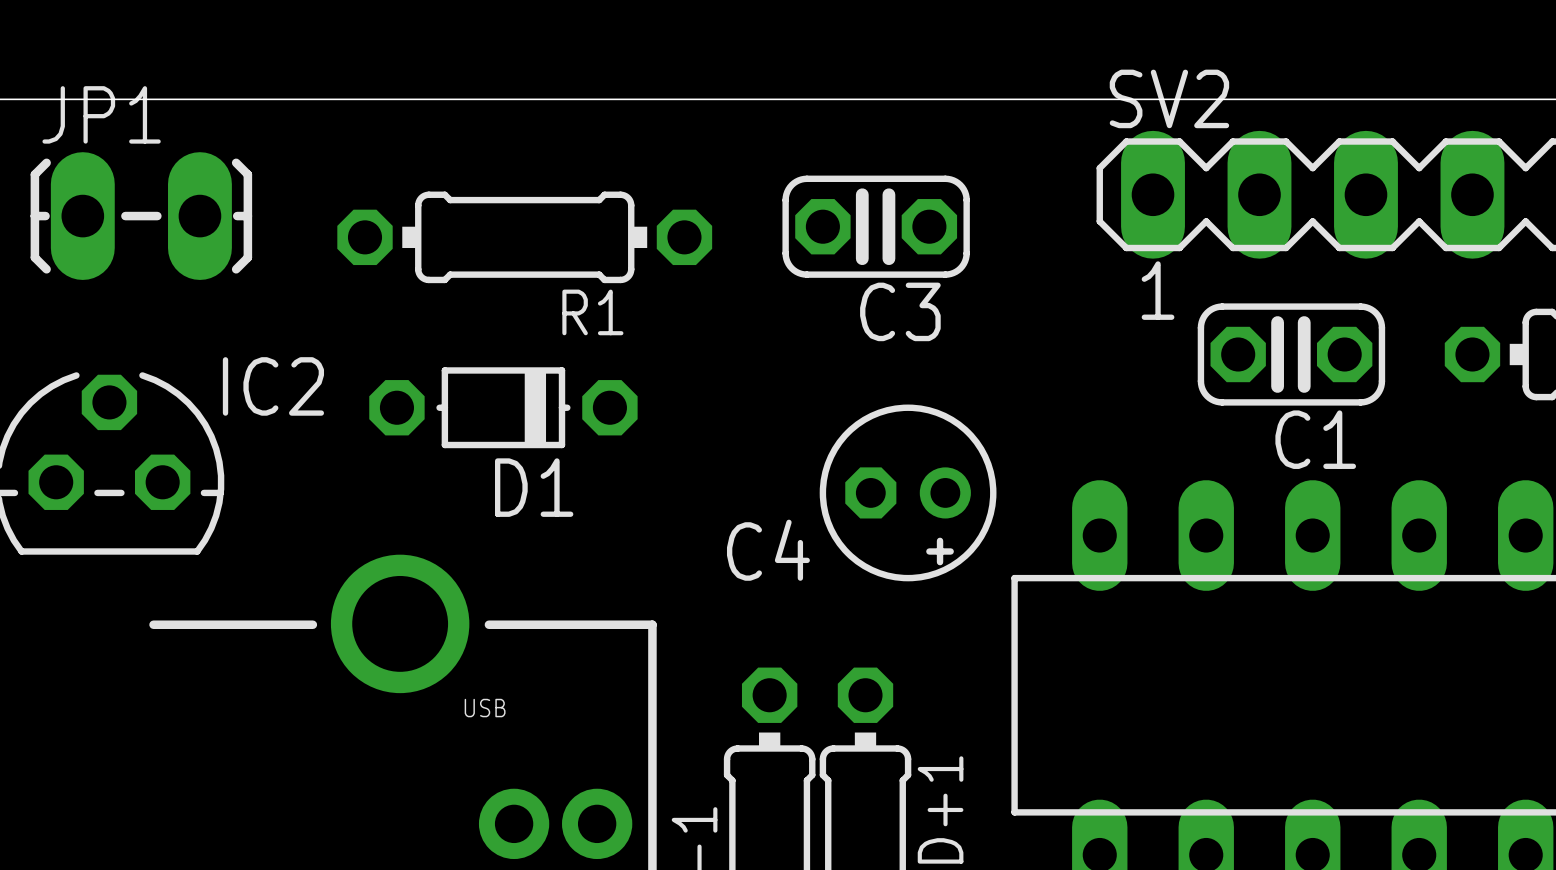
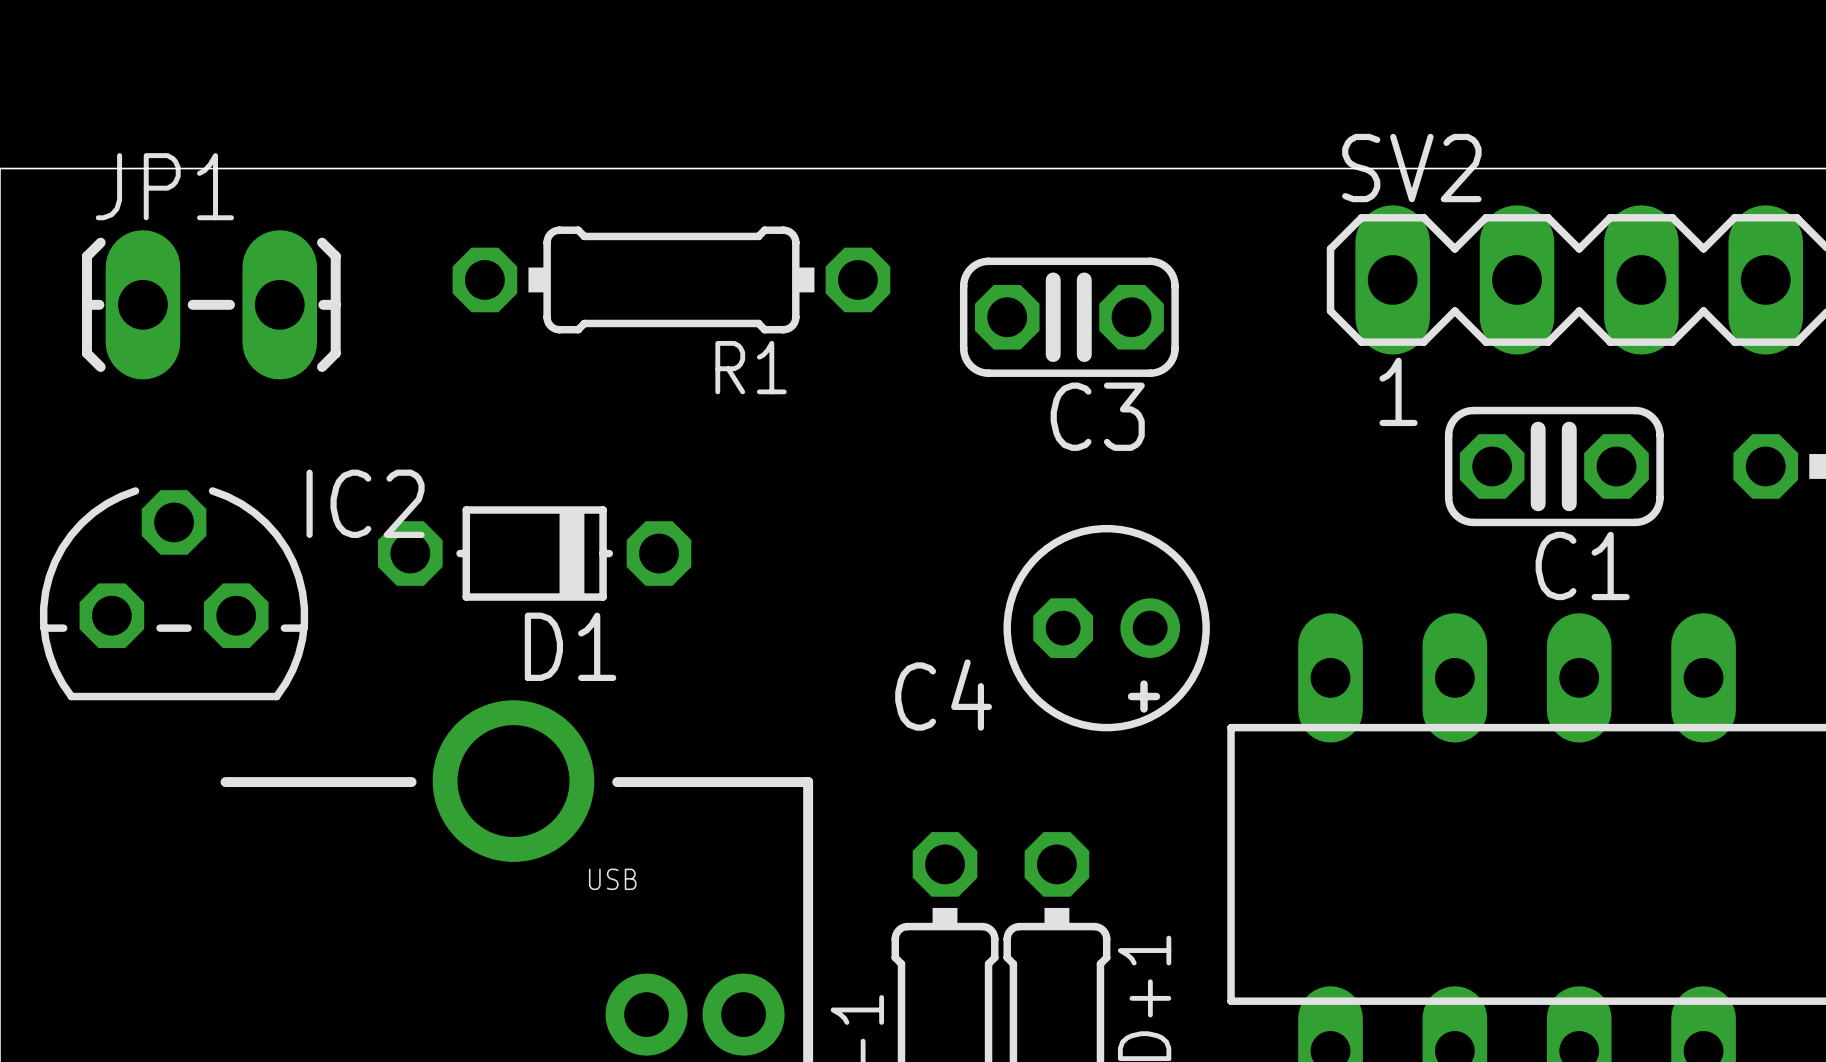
R1 position: (524, 237) -> (671, 279)
D1 position: (503, 407) -> (534, 553)

